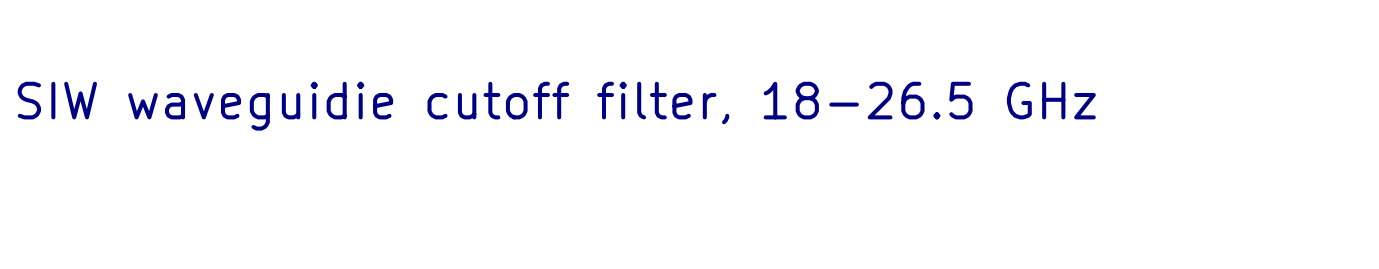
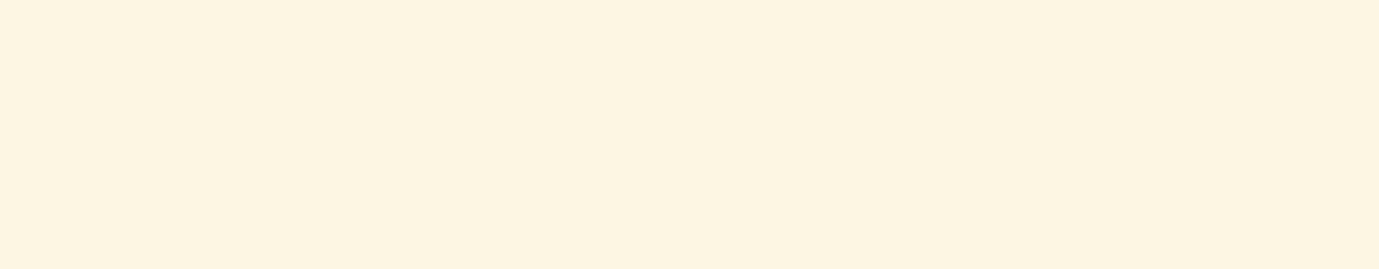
text: SIW waveguidie cutoff filter, 18-26.5 GHz (556, 106) -> none

